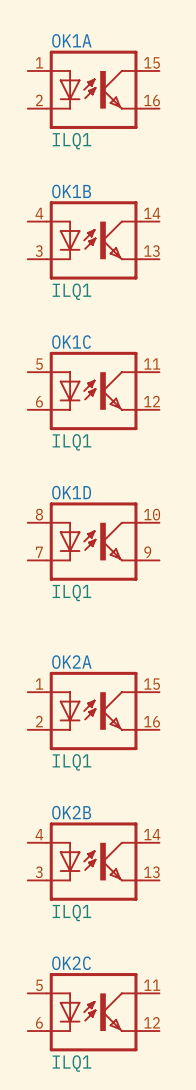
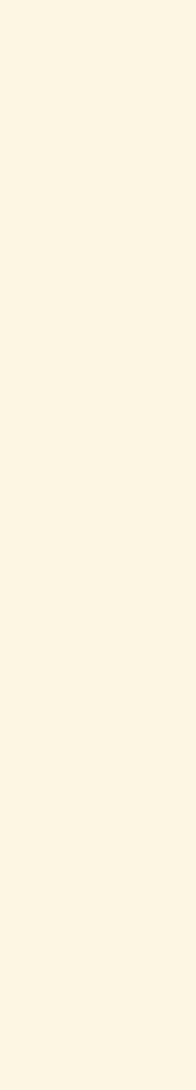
OK1A: ILQ1 (93, 89) -> none
OK1B: ILQ1 (93, 240) -> none
OK1C: ILQ1 (93, 391) -> none
OK1D: ILQ1 (93, 541) -> none
OK2A: ILQ1 (93, 711) -> none
OK2B: ILQ1 (93, 861) -> none
OK2C: ILQ1 (93, 1012) -> none

